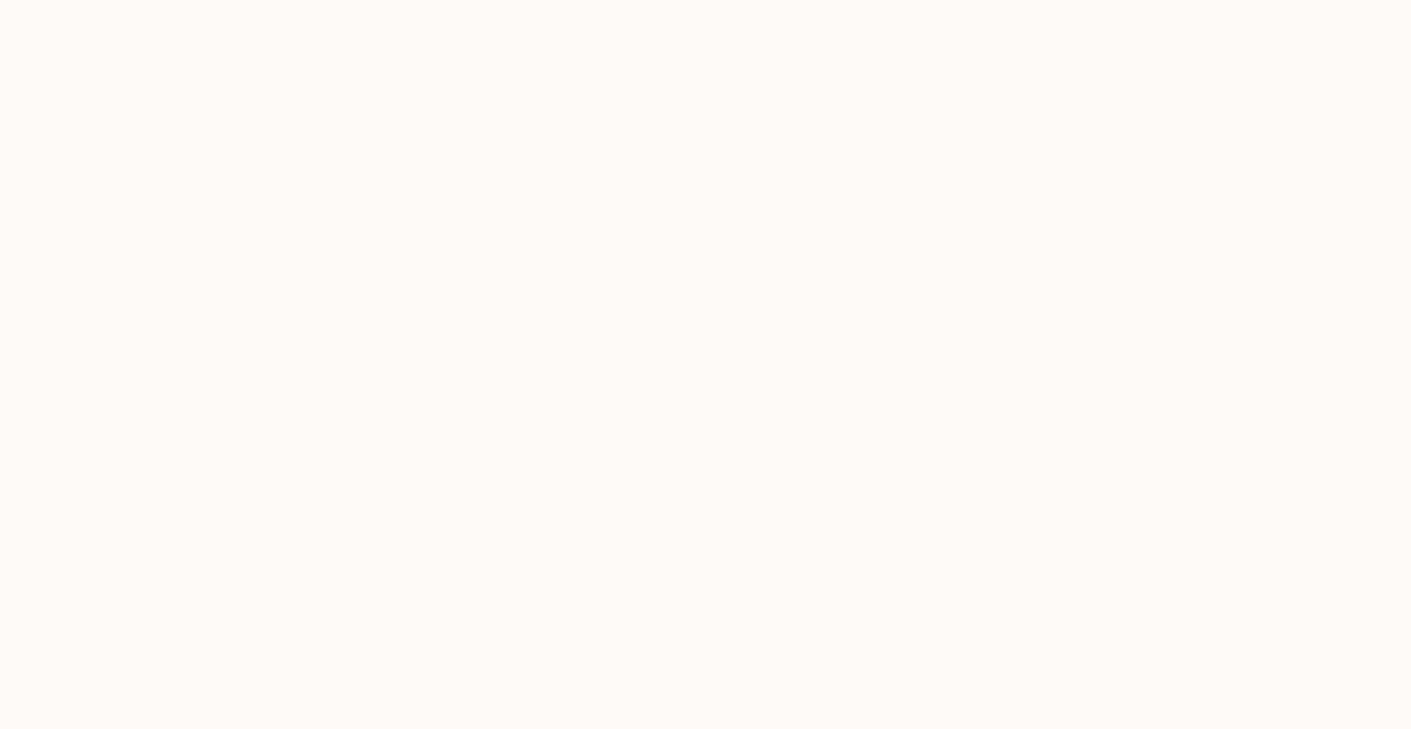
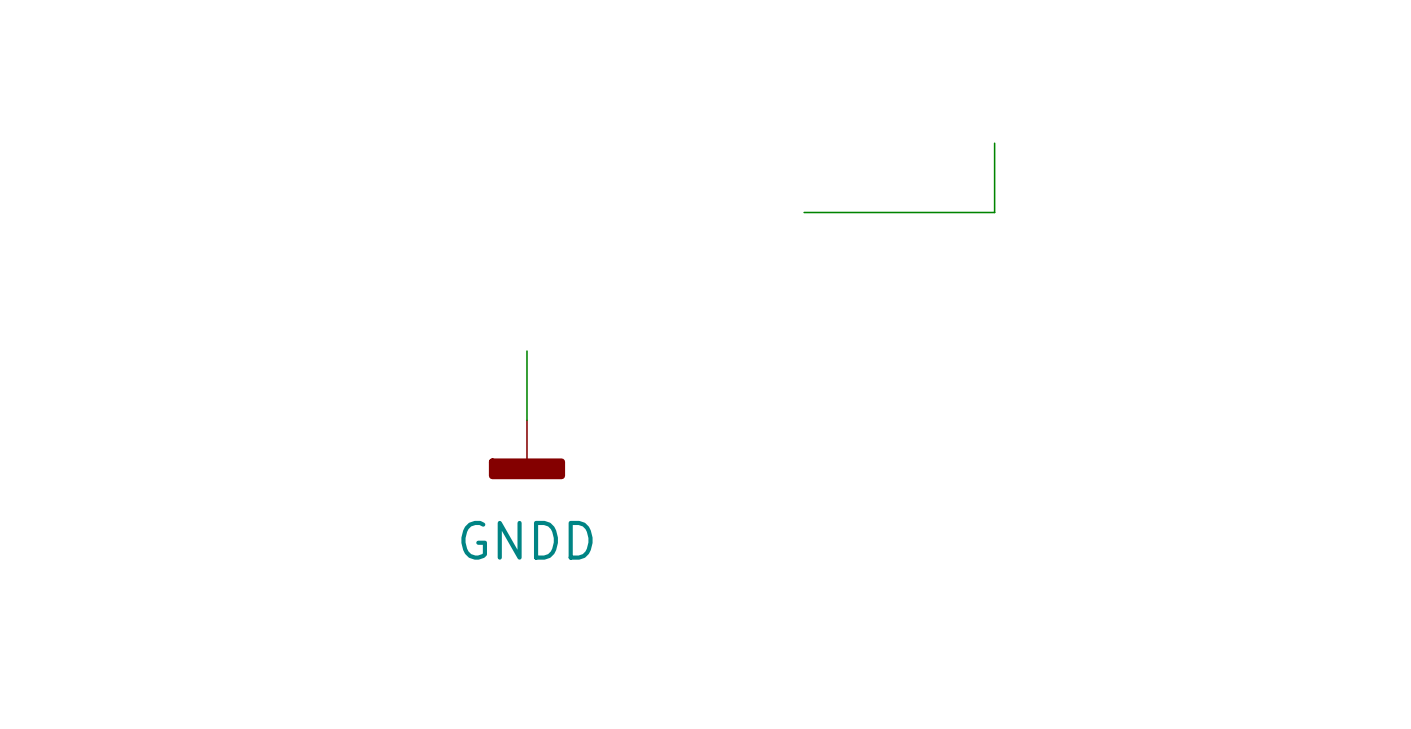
wire: none -> (994, 143) (994, 212) (804, 212)
wire: none -> (526, 351) (526, 420)
power symbol: none -> GNDD (526, 449)

